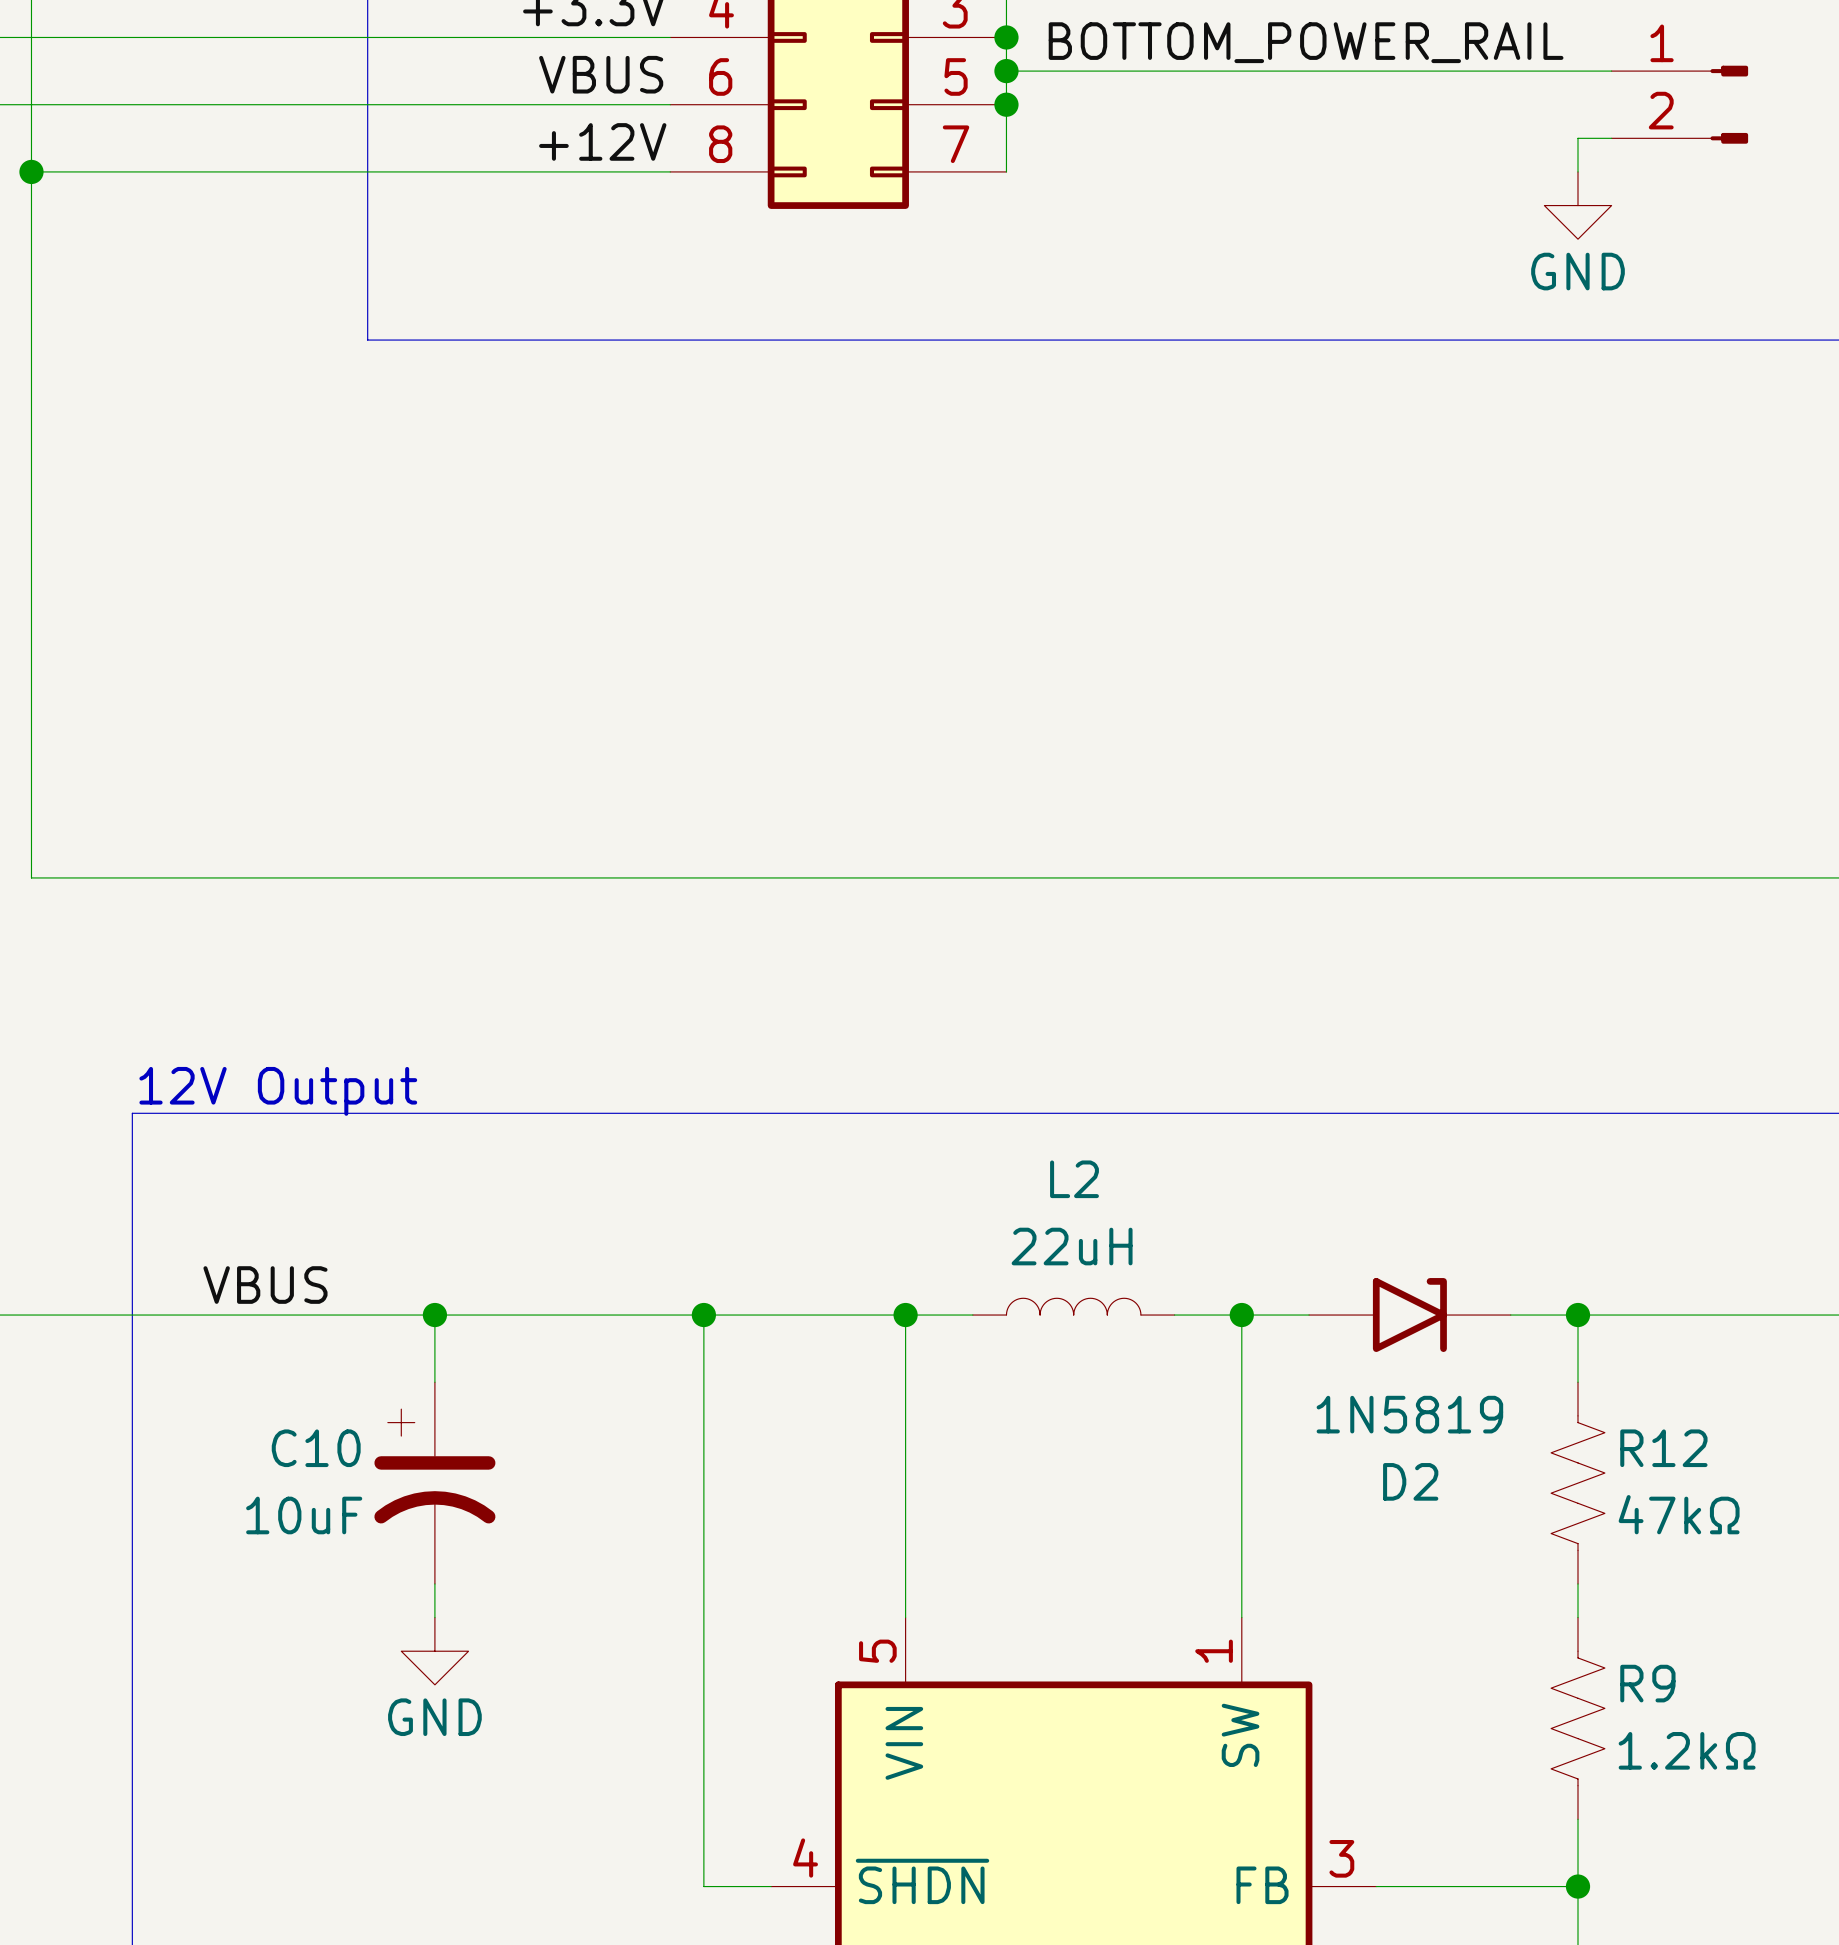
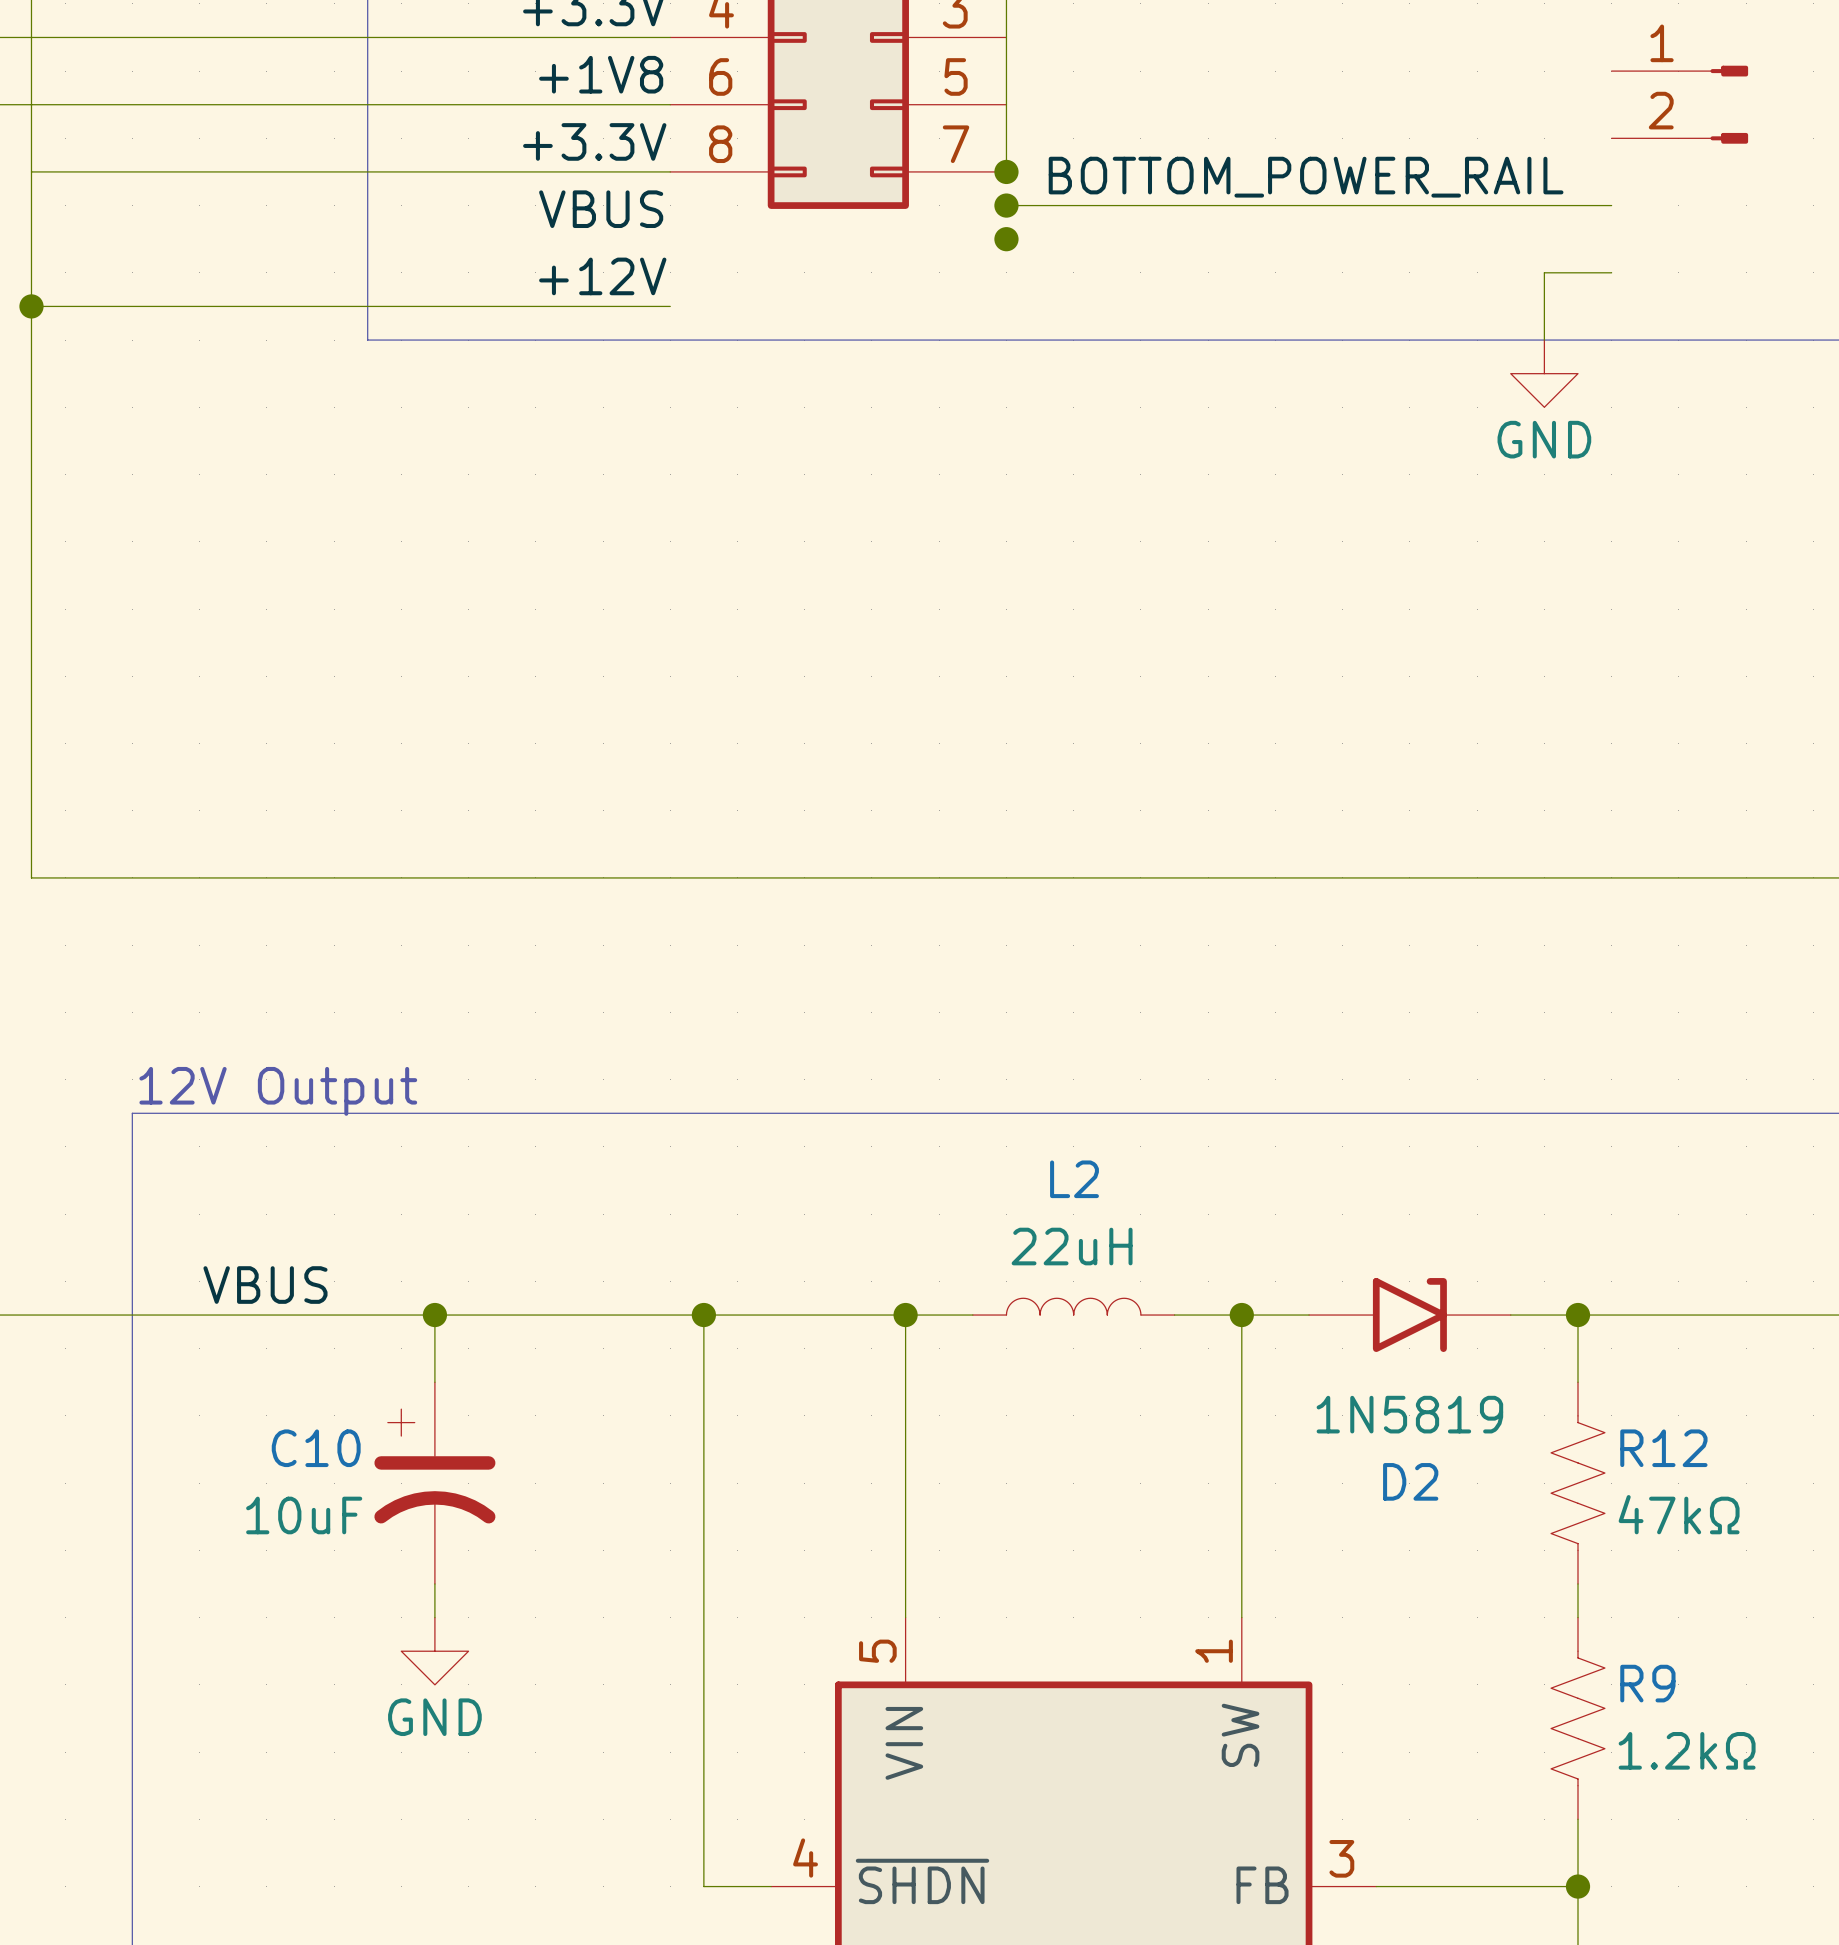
junction: (1006, 37) -> none
label position: BOTTOM_POWER_RAIL (1306, 42) -> BOTTOM_POWER_RAIL (1306, 177)
wire: (1006, 71) (1611, 71) -> (1006, 205) (1611, 205)
junction: (1006, 71) -> none
label: VBUS (601, 74) -> +1V8 (601, 74)
junction: (1006, 104) -> none
wire: (1611, 138) (1578, 138) (1578, 171) -> none
label: +12V (602, 141) -> +3.3V (594, 141)
junction: (31, 171) -> none
junction: none -> (1006, 171)
junction: none -> (1006, 205)
power symbol position: GND (1578, 205) -> GND (1544, 373)
label: none -> VBUS (601, 209)
junction: none -> (1006, 239)
wire: none -> (1611, 272) (1544, 272) (1544, 340)
label: none -> +12V (602, 276)
wire: none -> (31, 306) (670, 306)
junction: none -> (31, 306)

